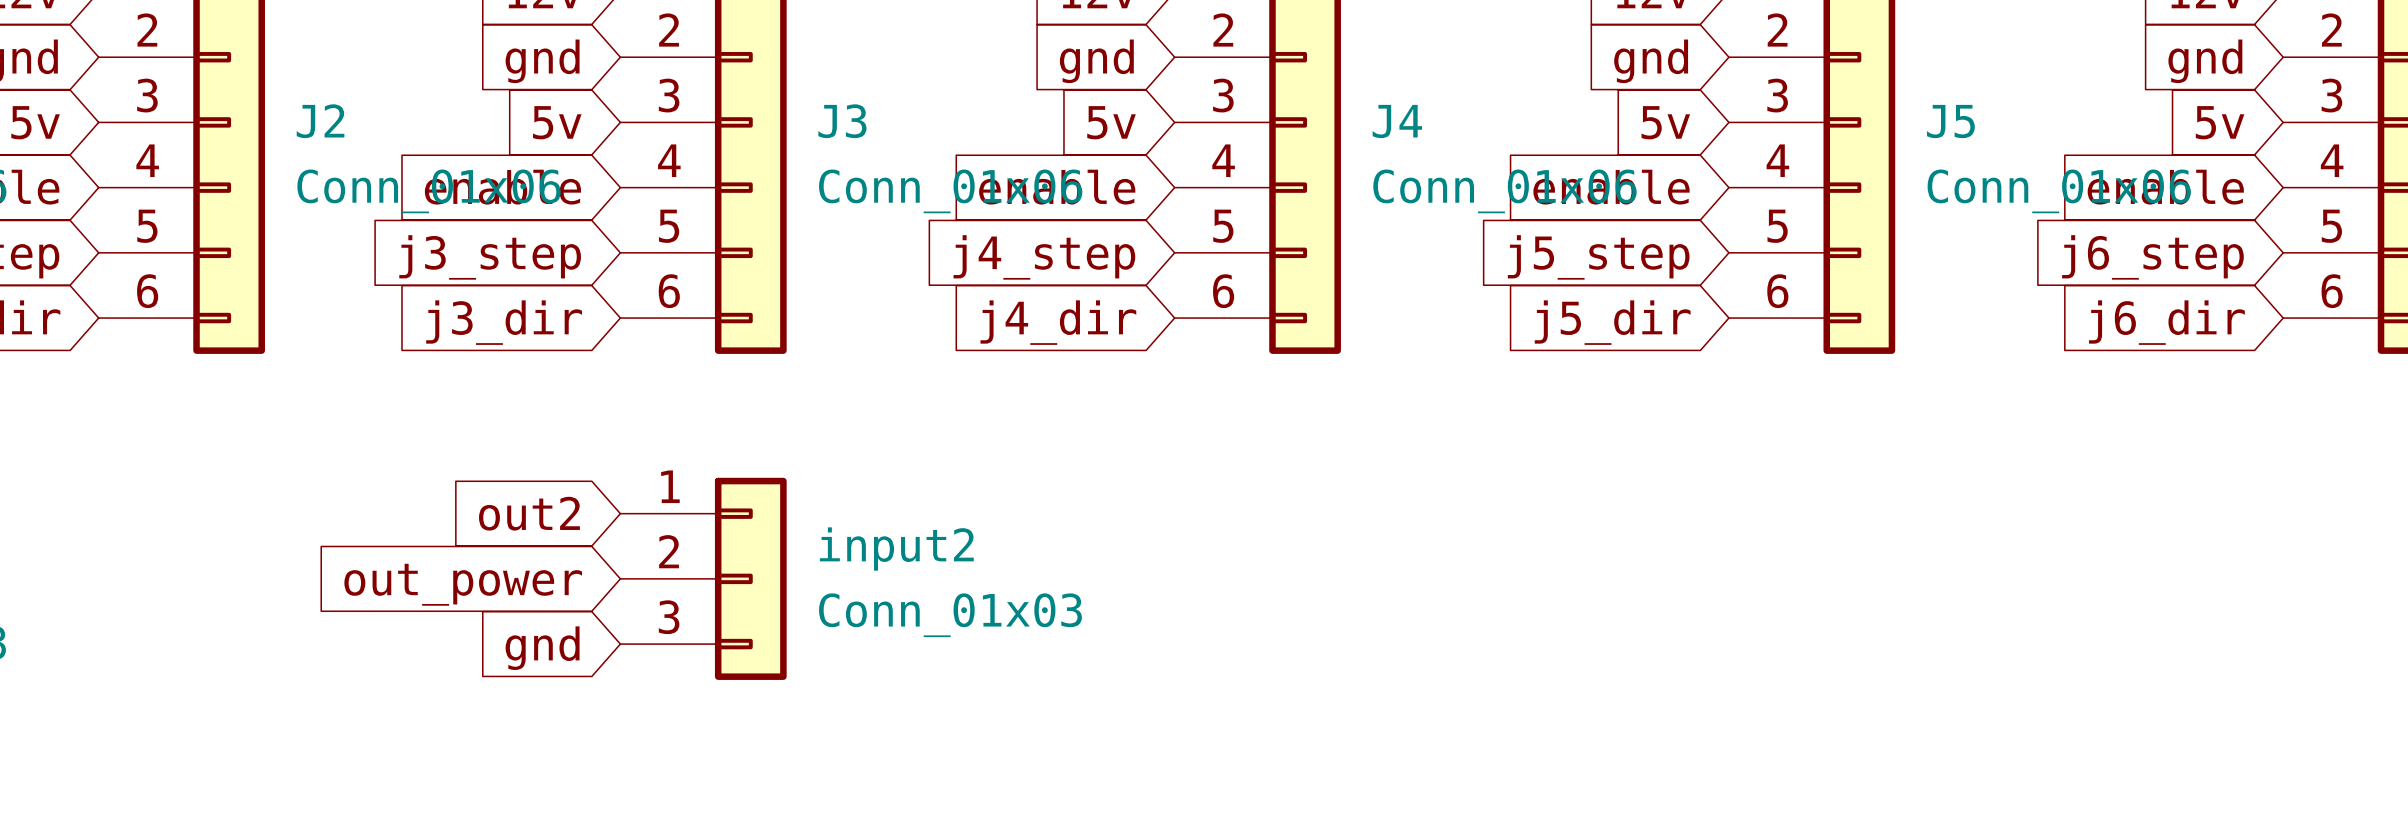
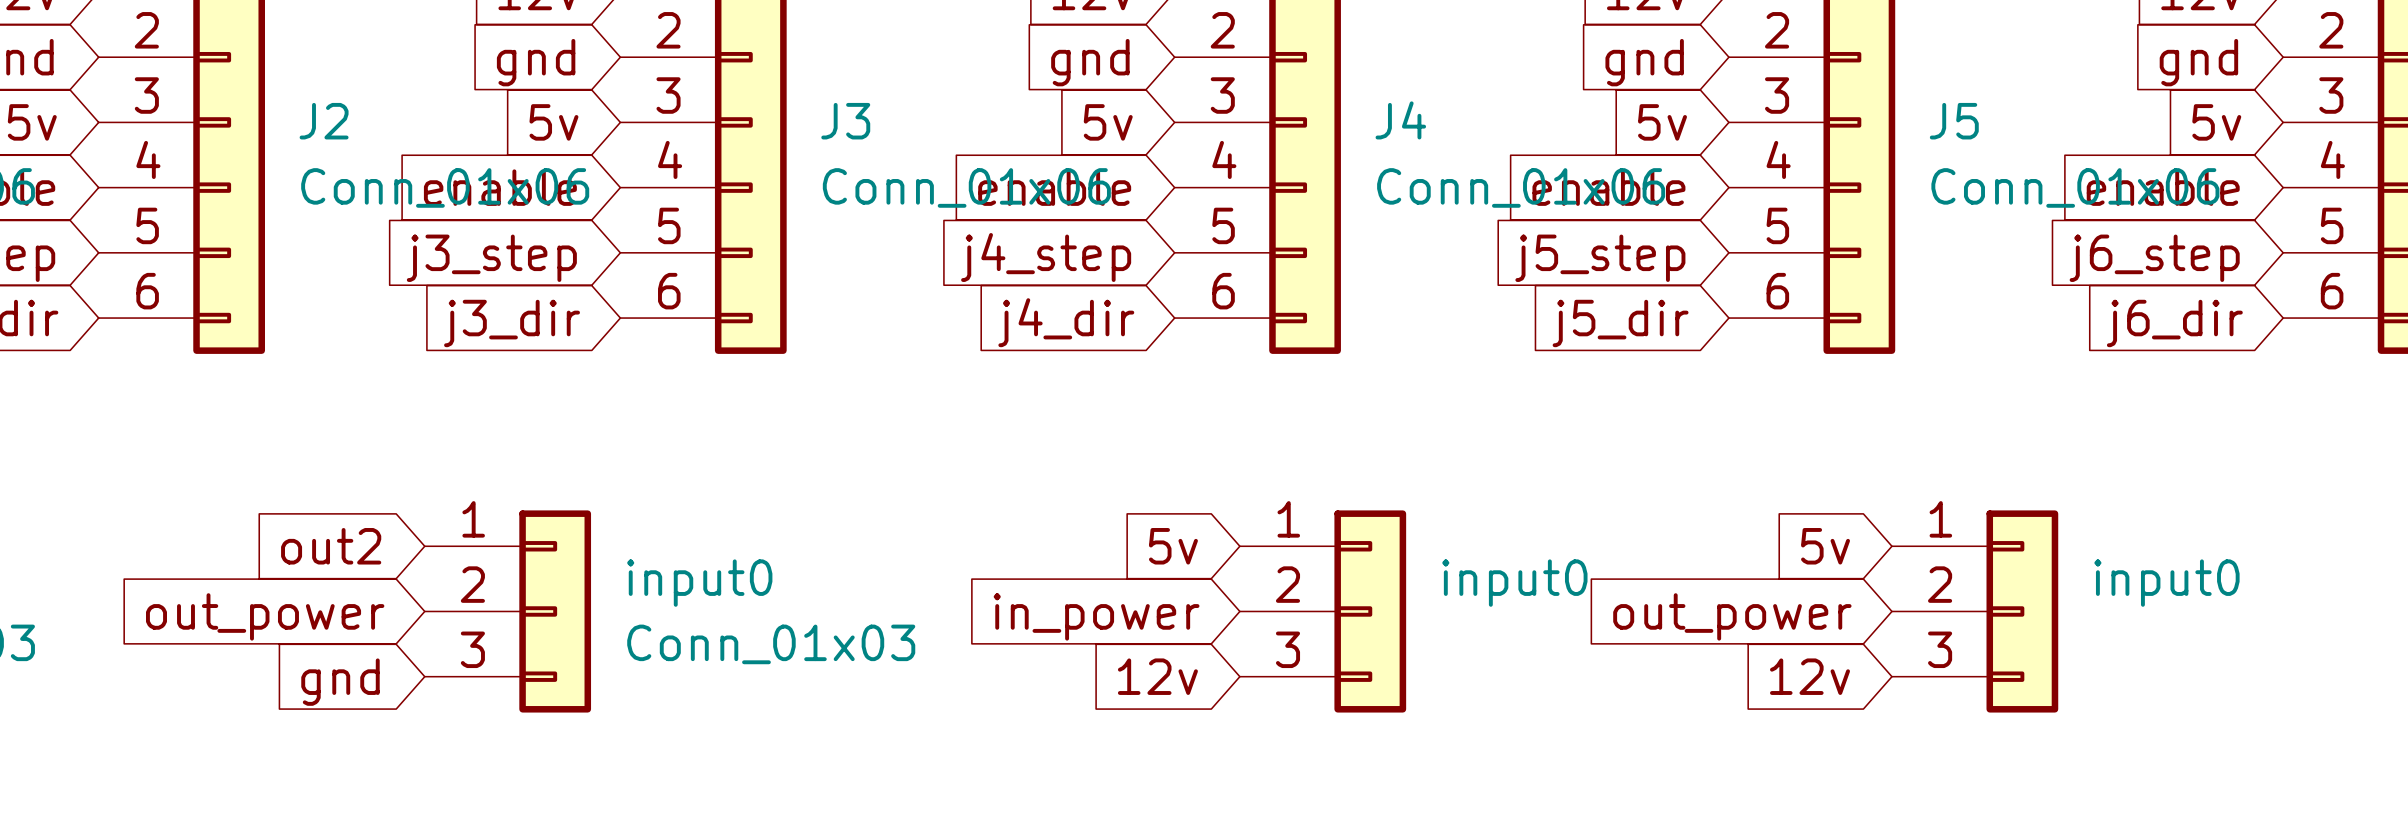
global label position: out2 (529, 513) -> out2 (331, 546)
global label: none -> 5v (1173, 546)
global label: none -> 5v (1825, 546)
input2: Conn_01x03 (703, 578) -> none
global label position: out_power (463, 584) -> out_power (265, 616)
input0: none -> Conn_01x03 (507, 611)
input0: none -> (1323, 611)
input0: none -> (1975, 611)
global label: none -> in_power (1096, 616)
global label: none -> out_power (1732, 616)
global label position: gnd (542, 648) -> gnd (340, 682)
global label: none -> 12v (1157, 676)
global label: none -> 12v (1810, 676)

